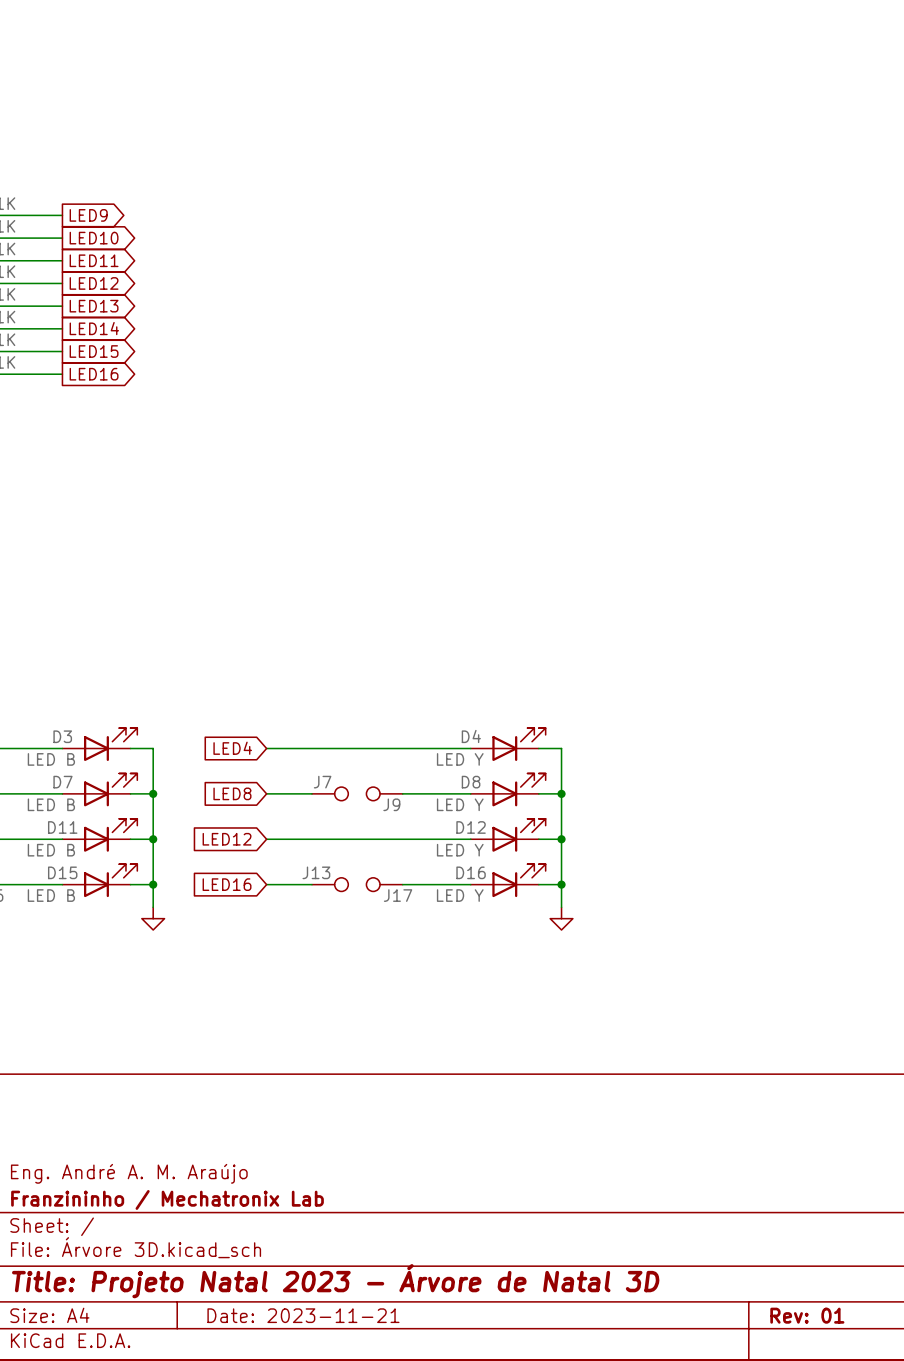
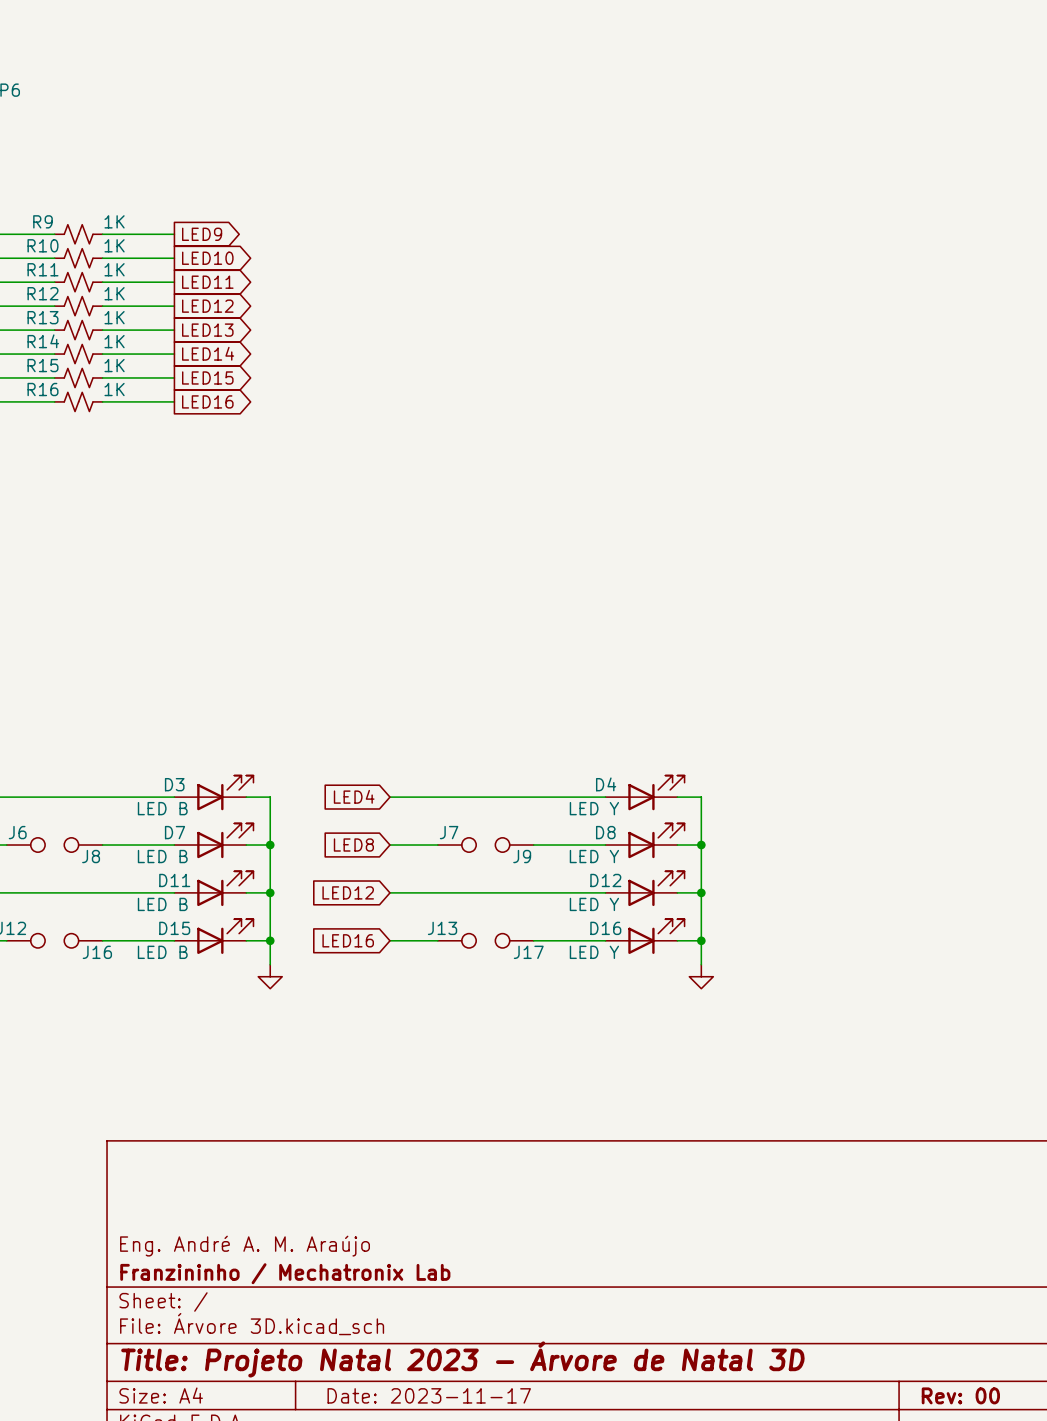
title block: Date: 2023-11-21 (303, 1315) -> Date: 2023-11-17 (429, 1395)
title block: Rev: 01 (807, 1315) -> Rev: 00 (960, 1395)

